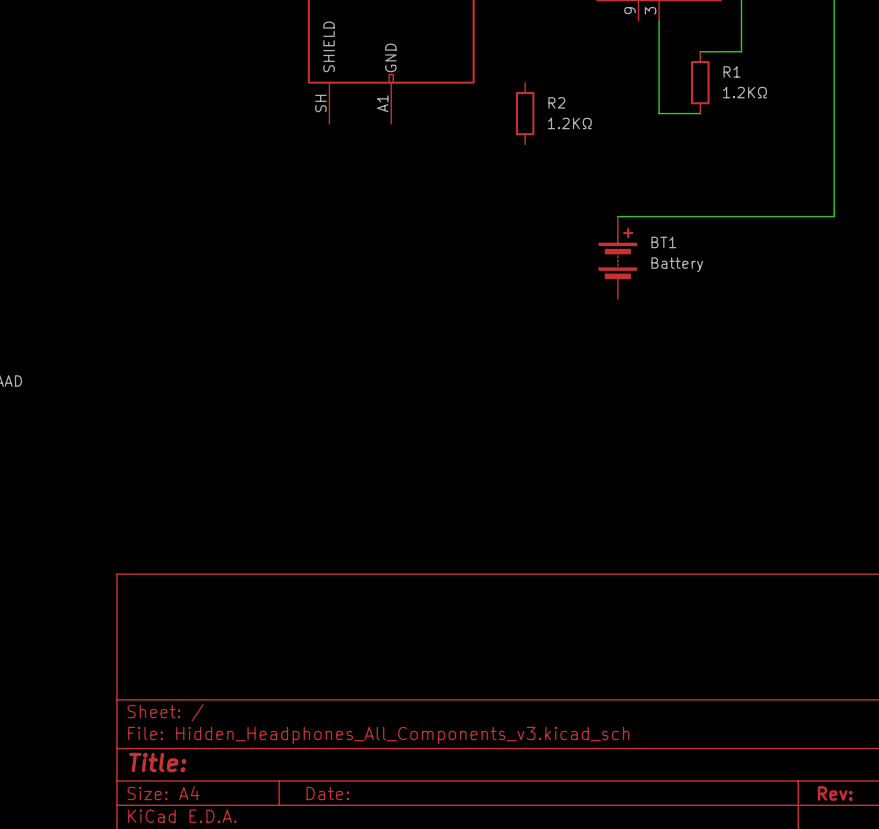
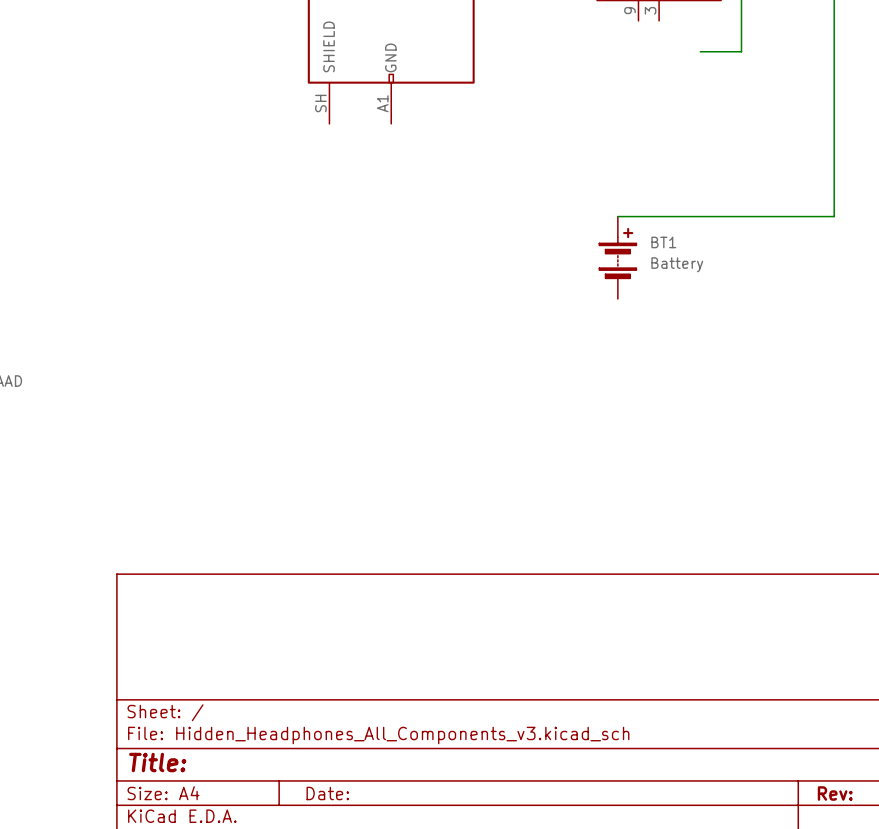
wire: (659, 20) (659, 113) (700, 113) -> none
R1: 1.2KΩ (700, 82) -> none
R2: 1.2KΩ (525, 113) -> none

